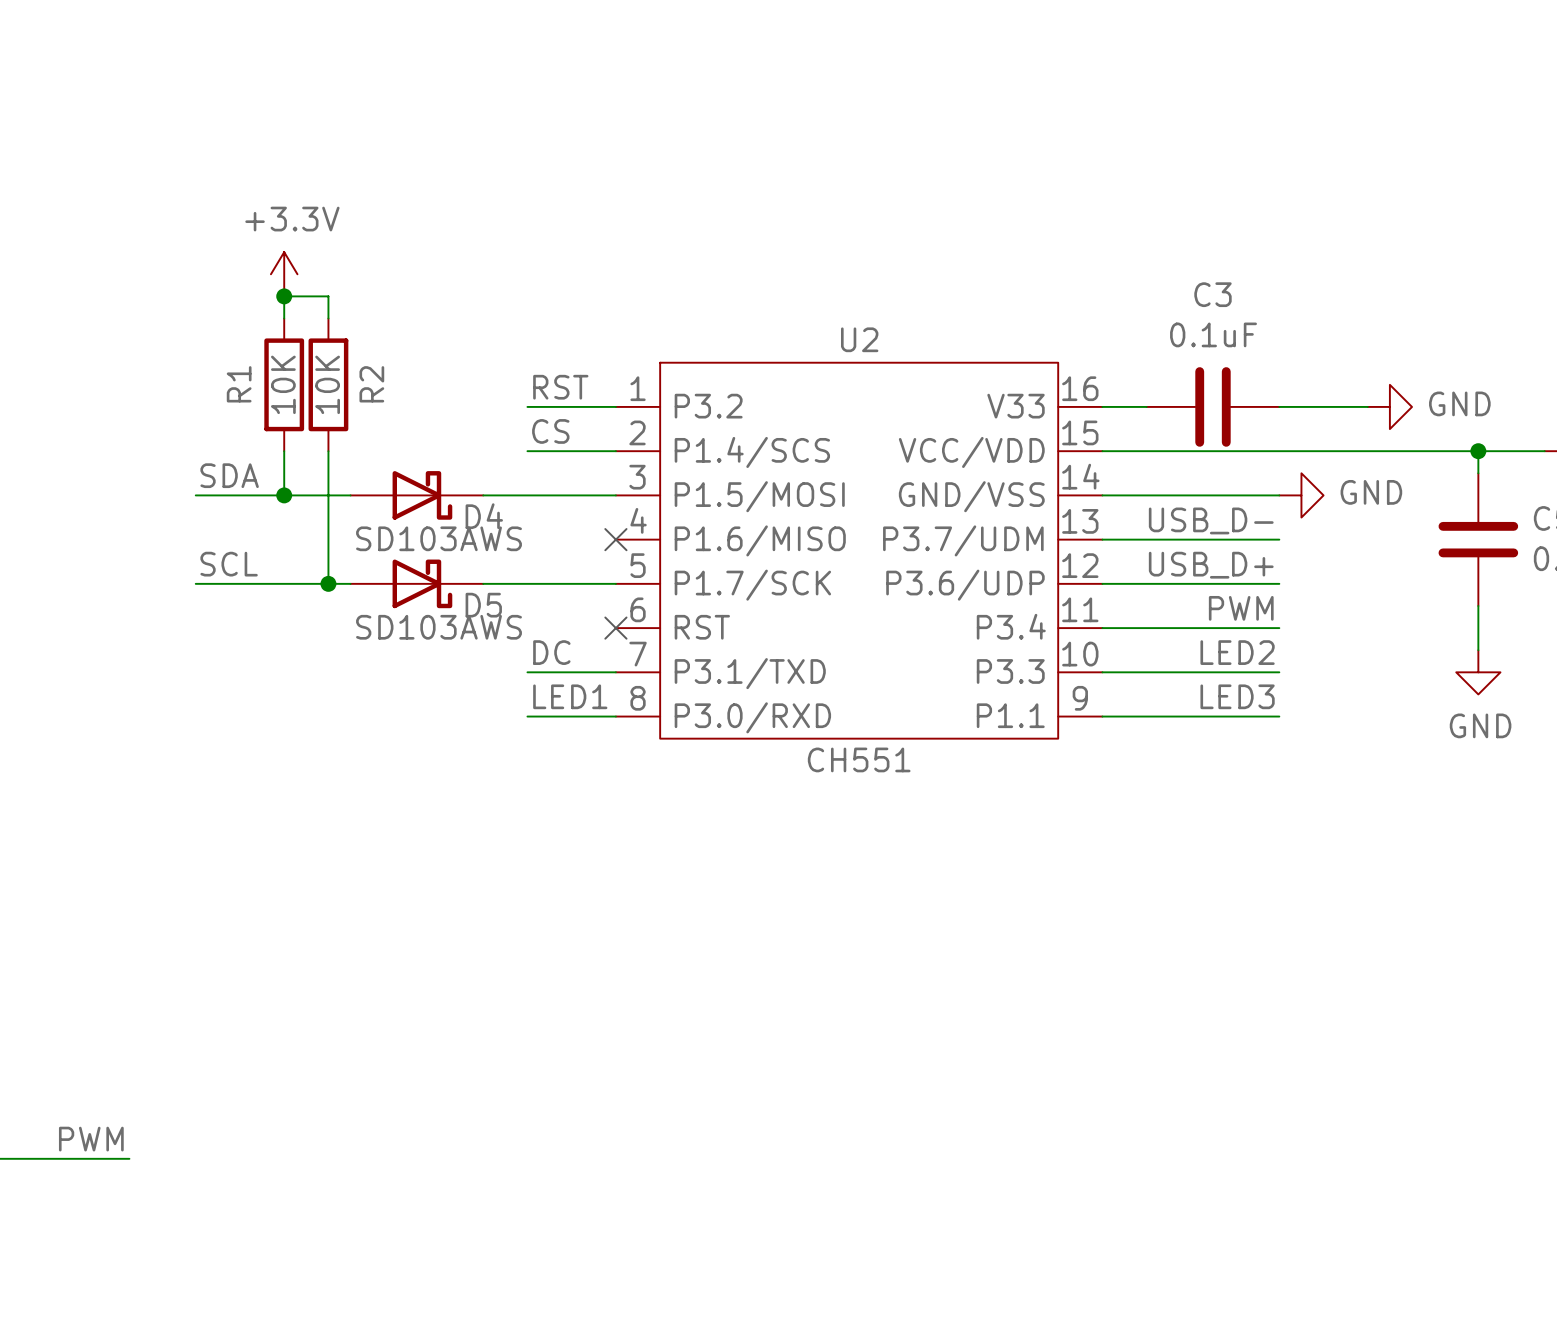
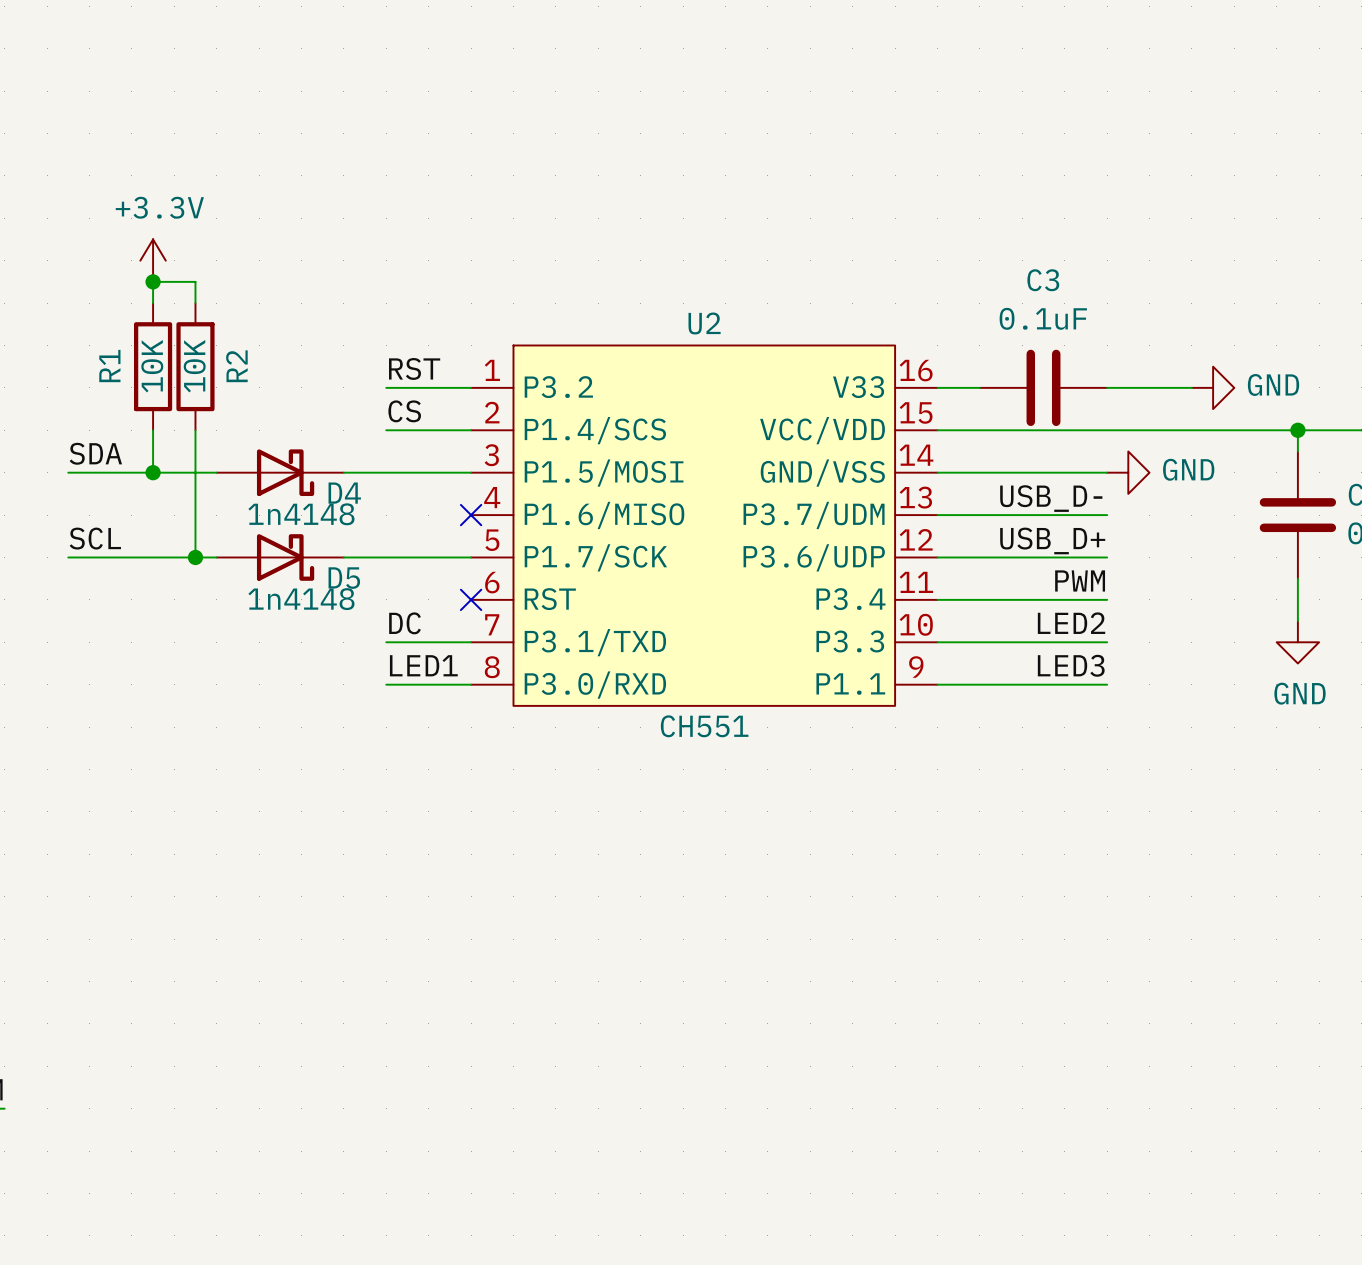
D4 value: SD103AWS (439, 538) -> 1n4148 (301, 514)
D5 value: SD103AWS (439, 627) -> 1n4148 (301, 599)

